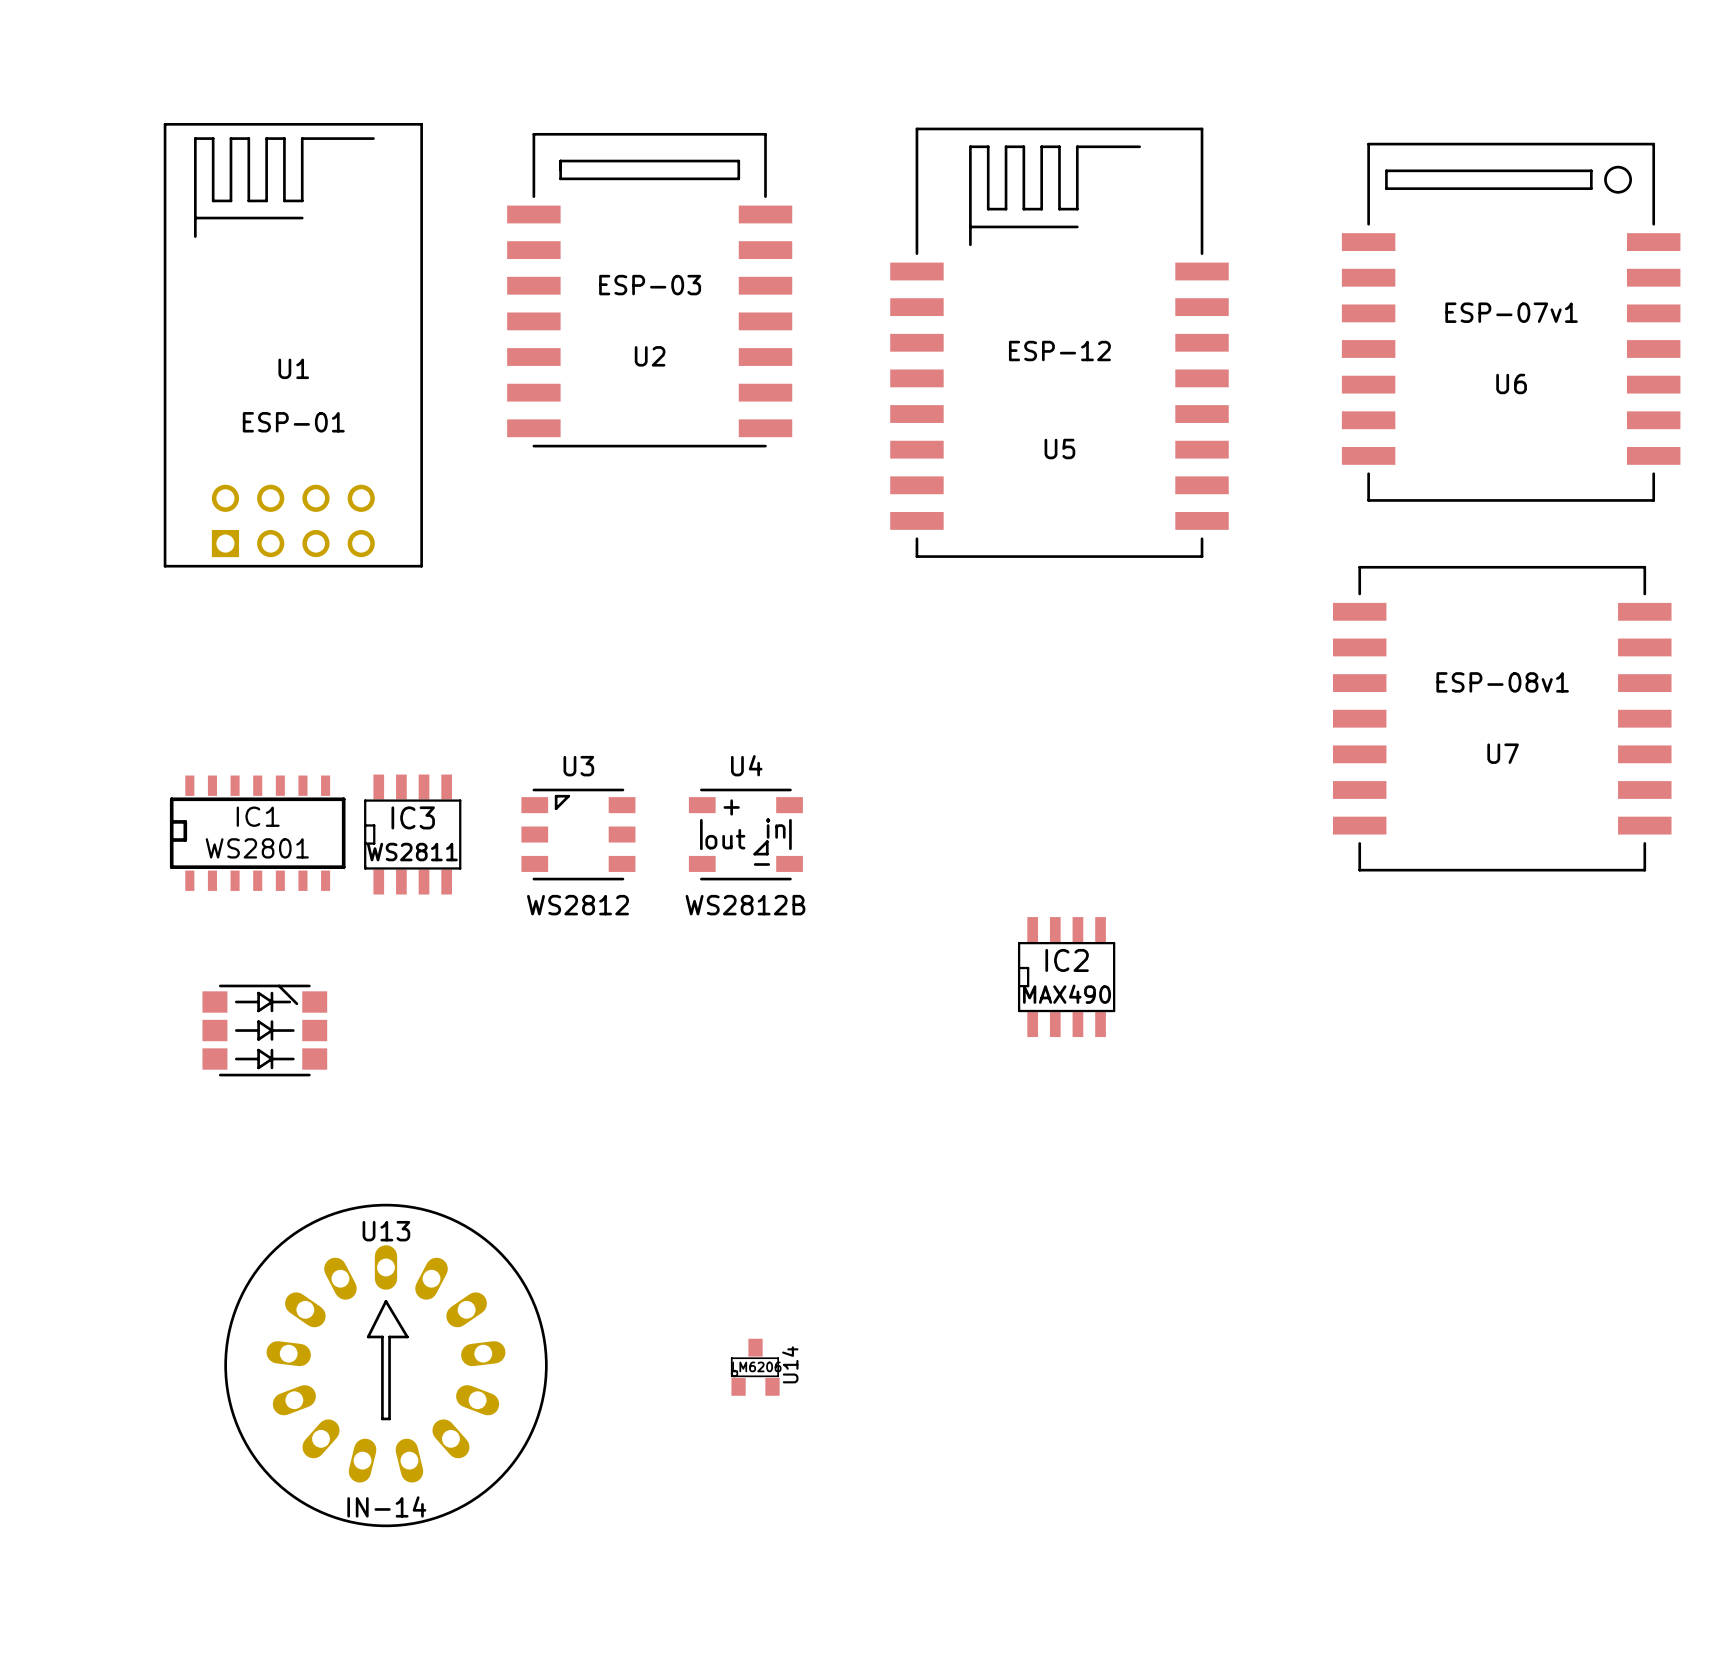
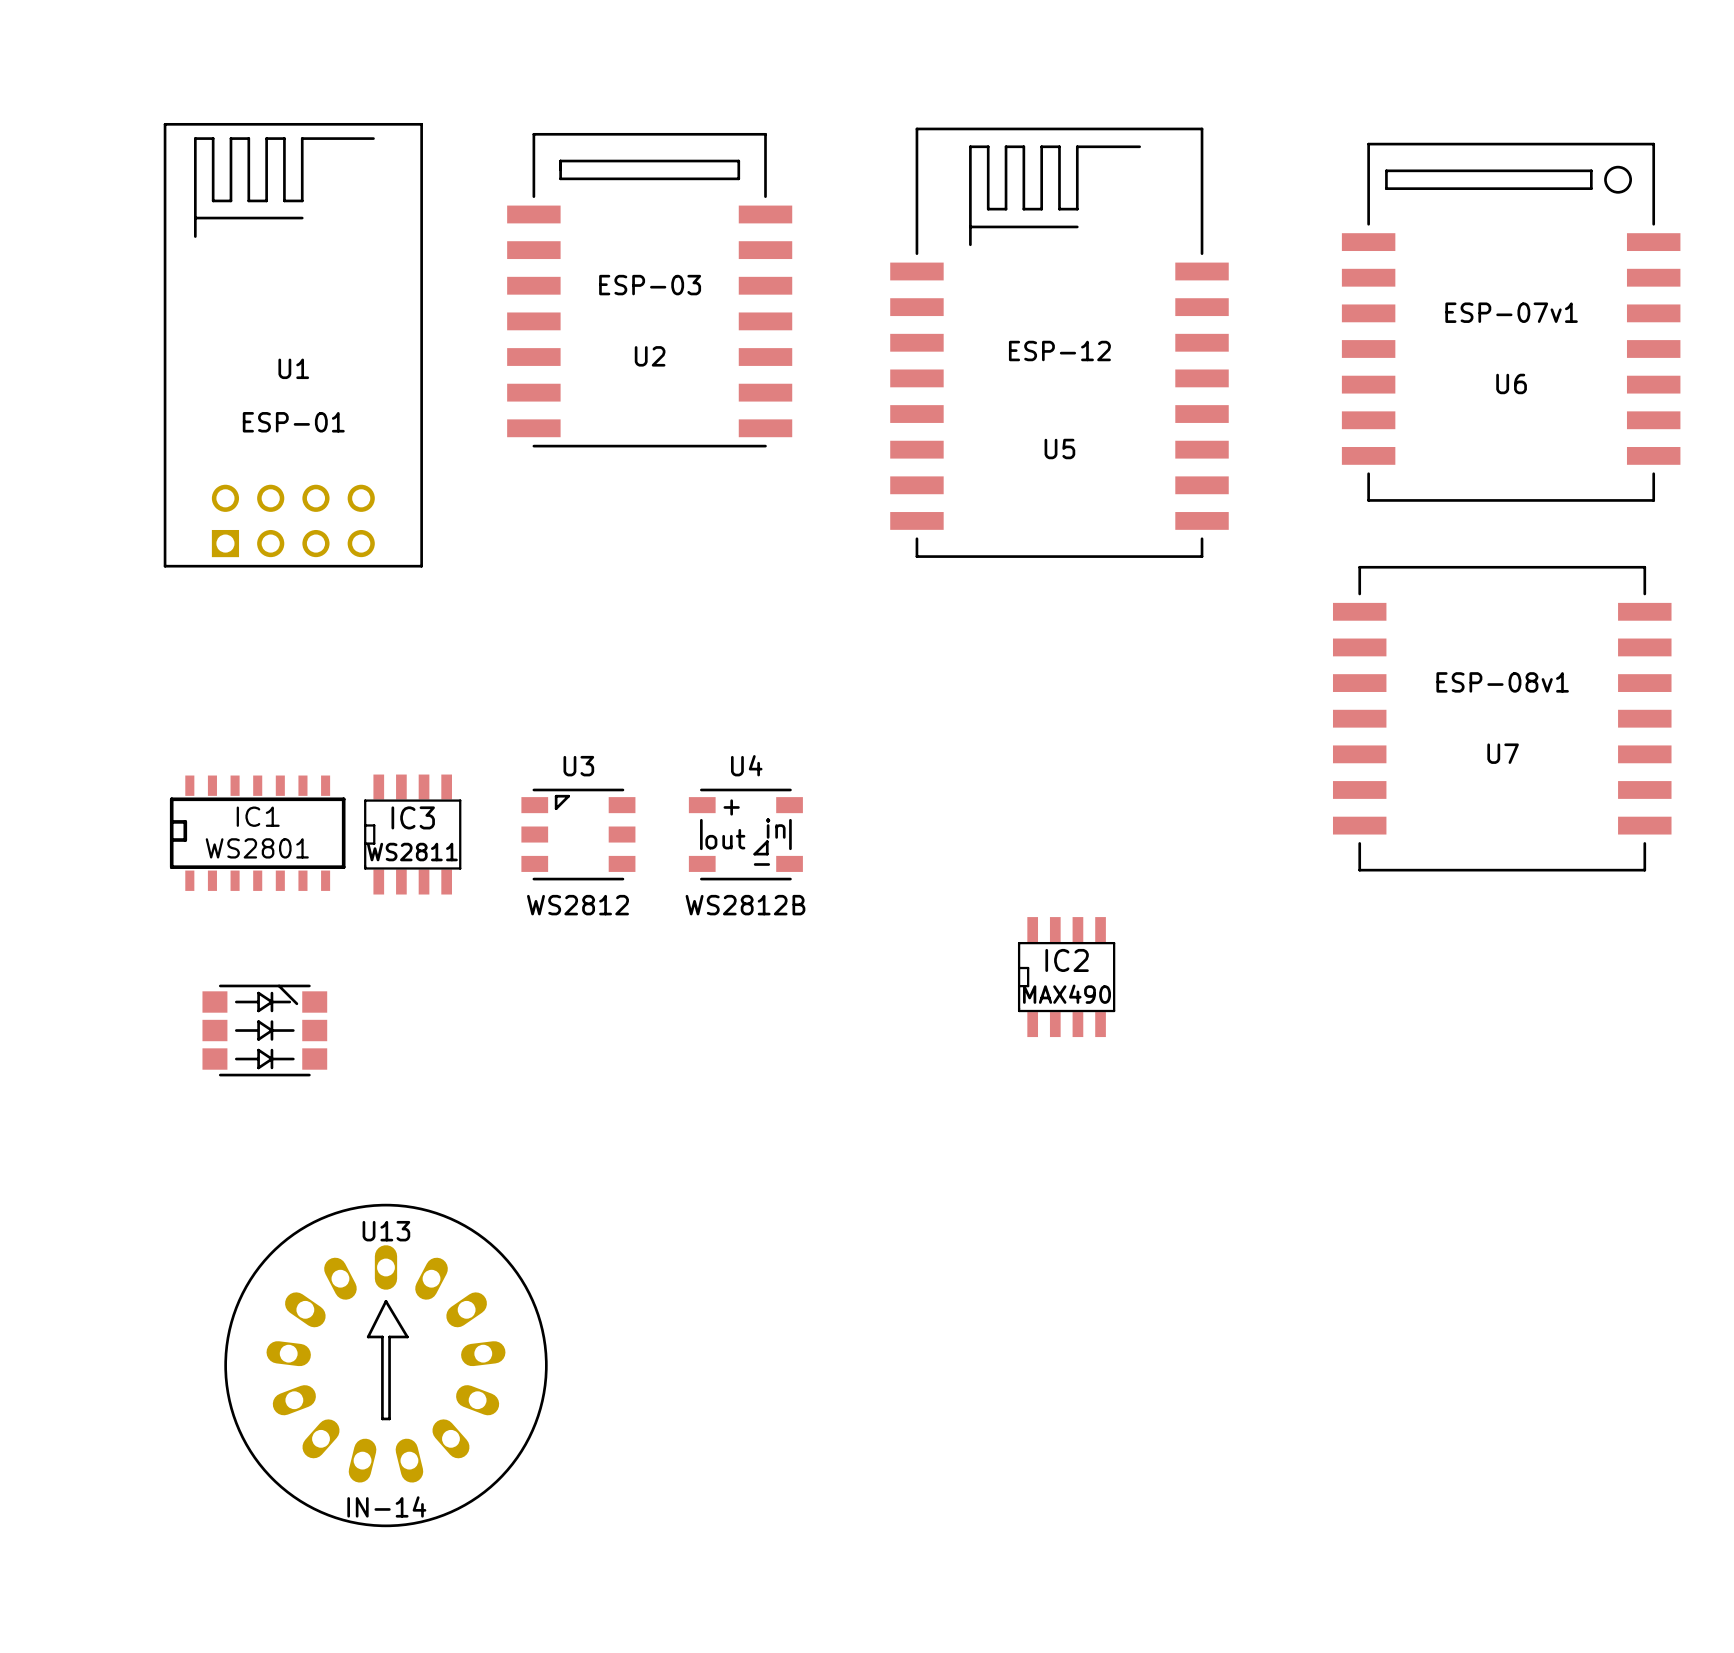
U14: LM6206 (755, 1367) -> none

